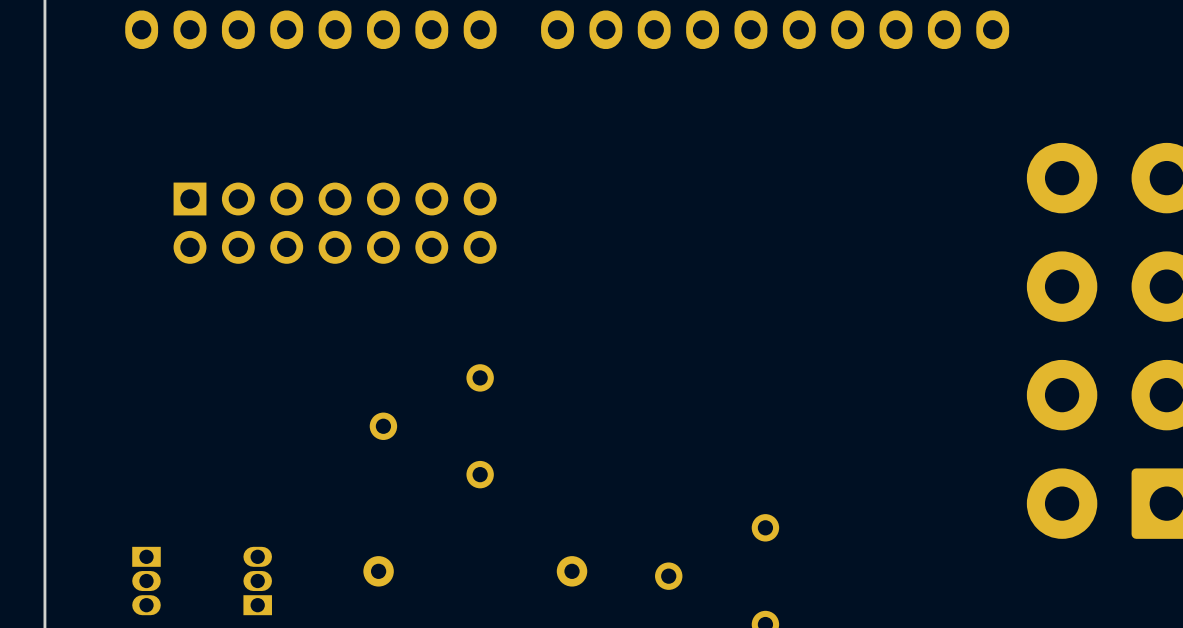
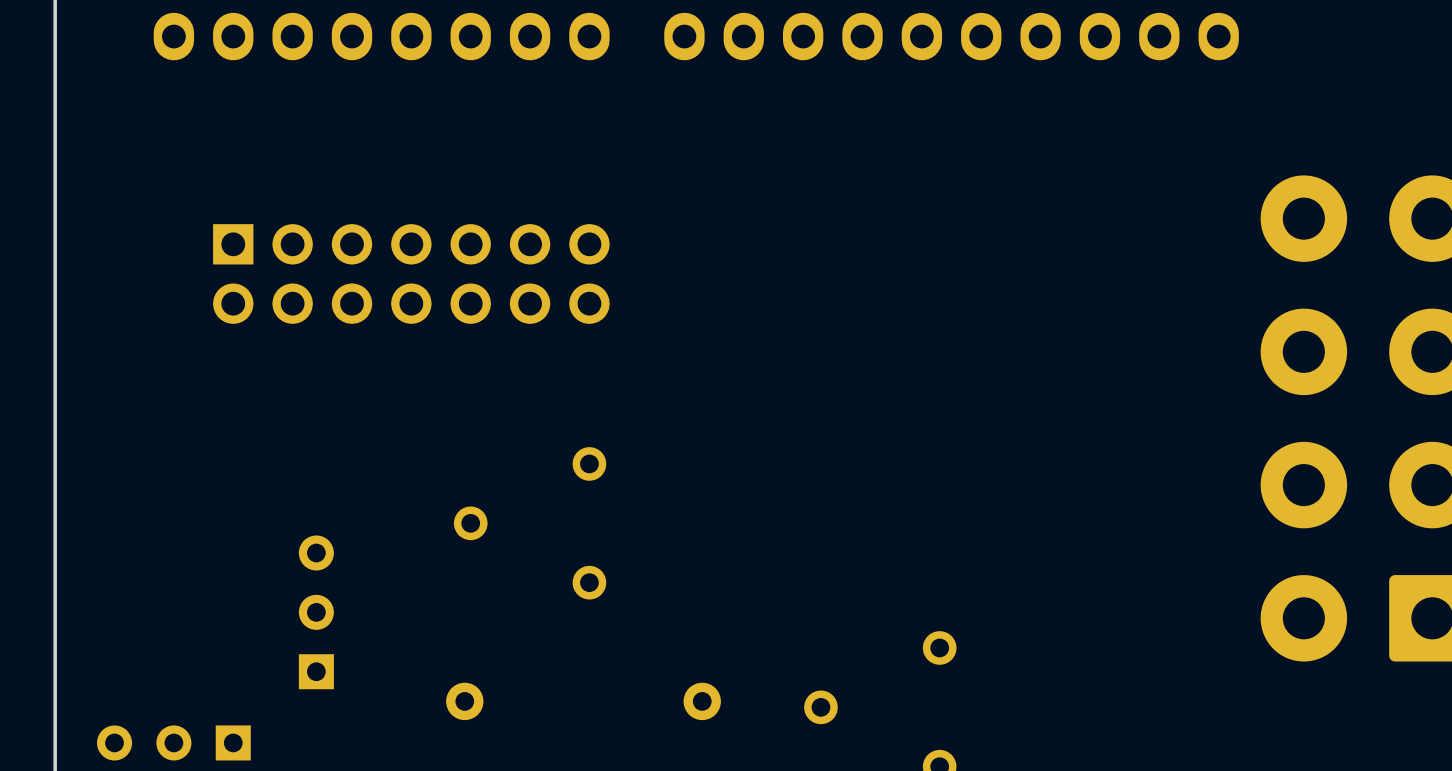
part: none -> (316, 612)
part: (146, 581) -> none
part: (257, 581) -> none
part: none -> (173, 742)

